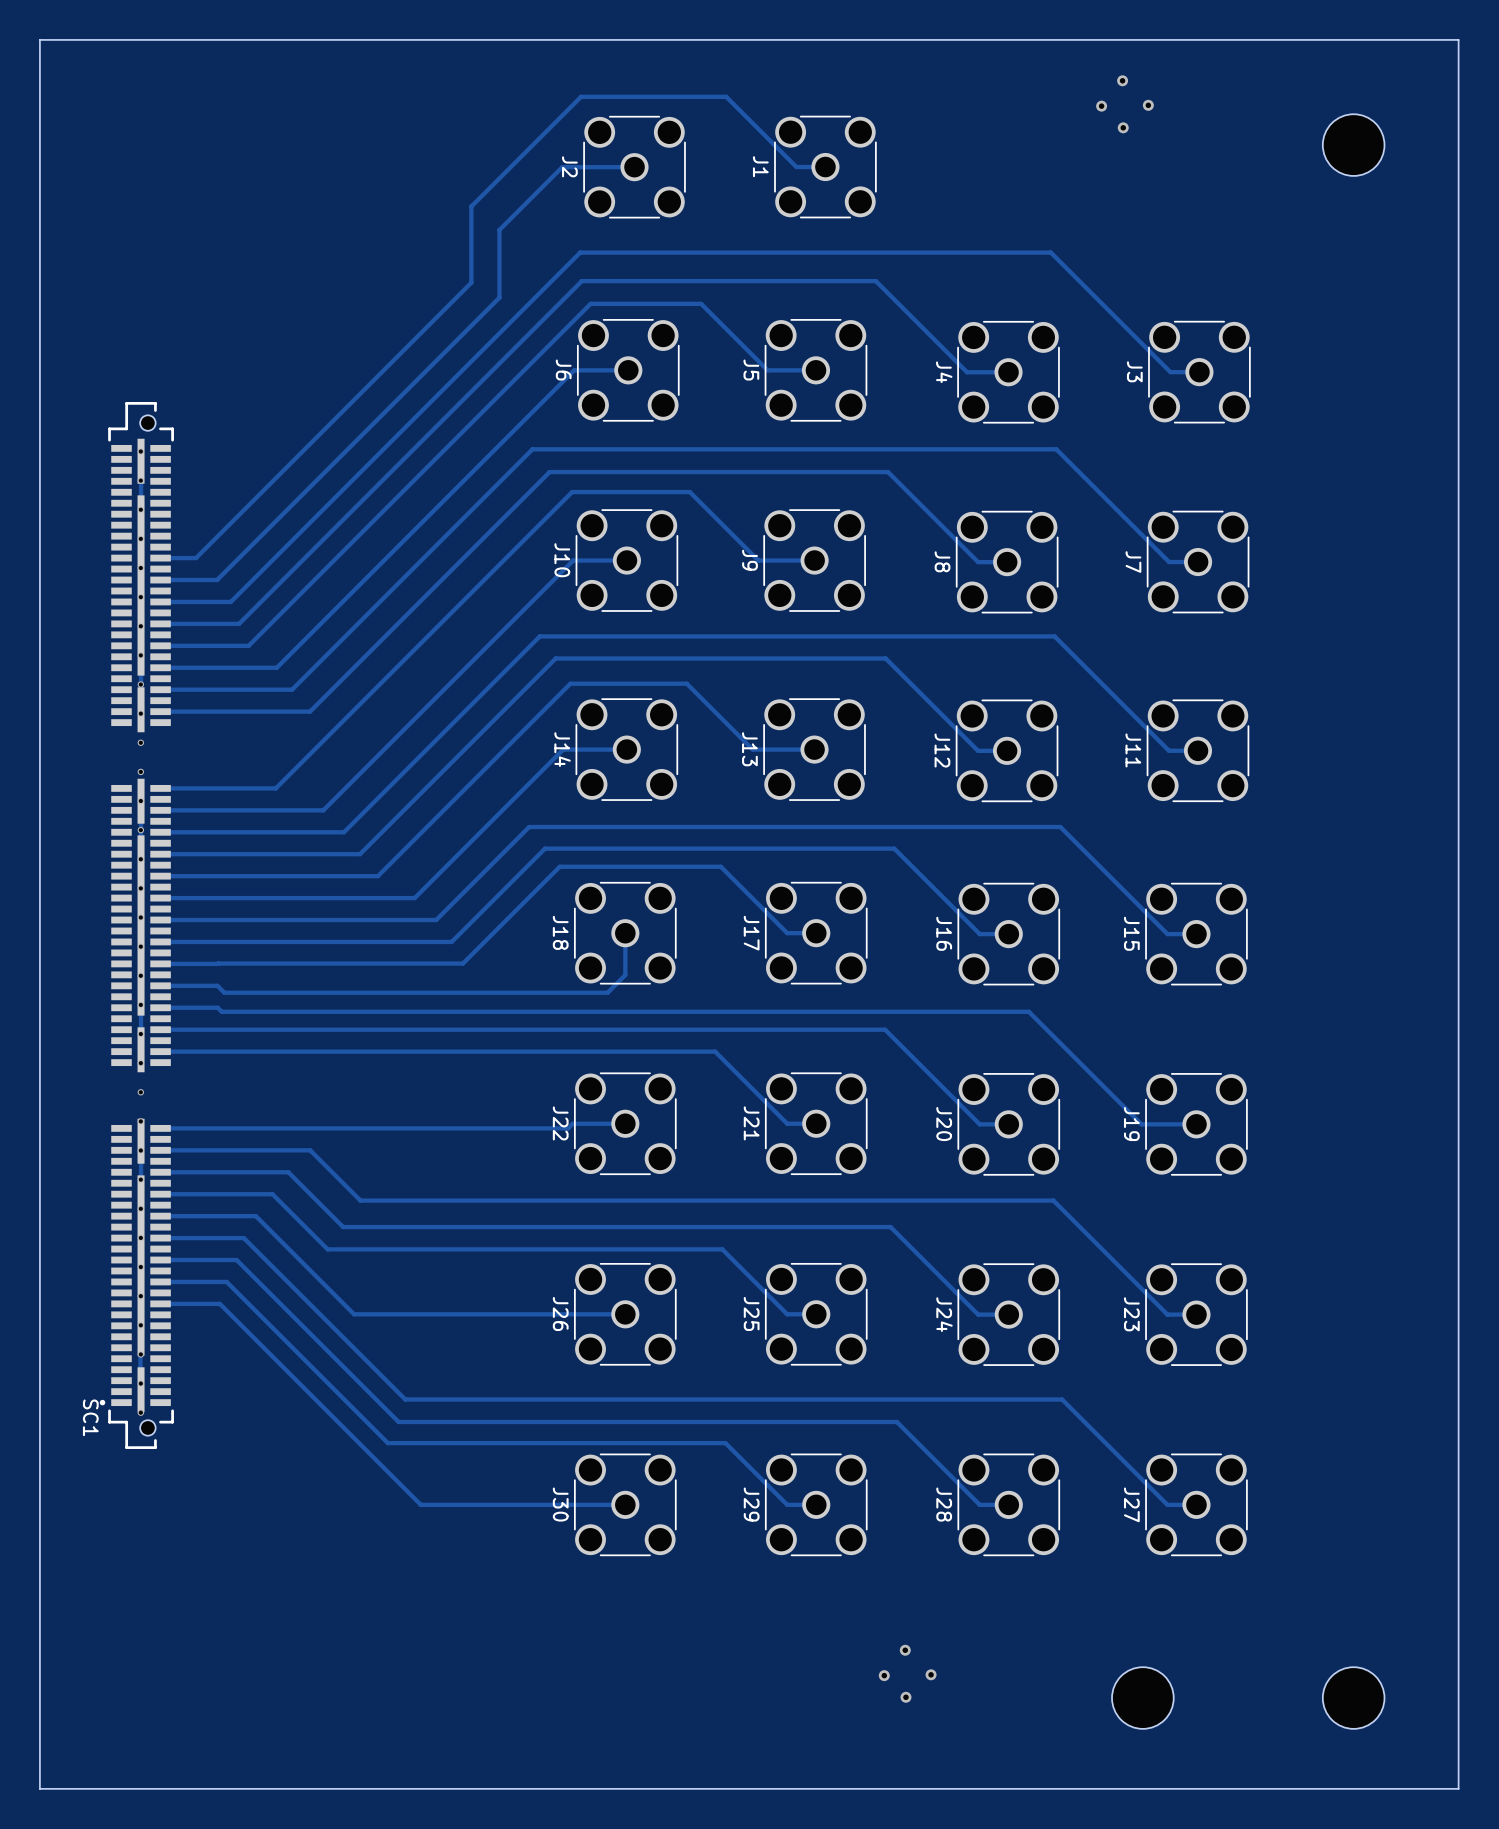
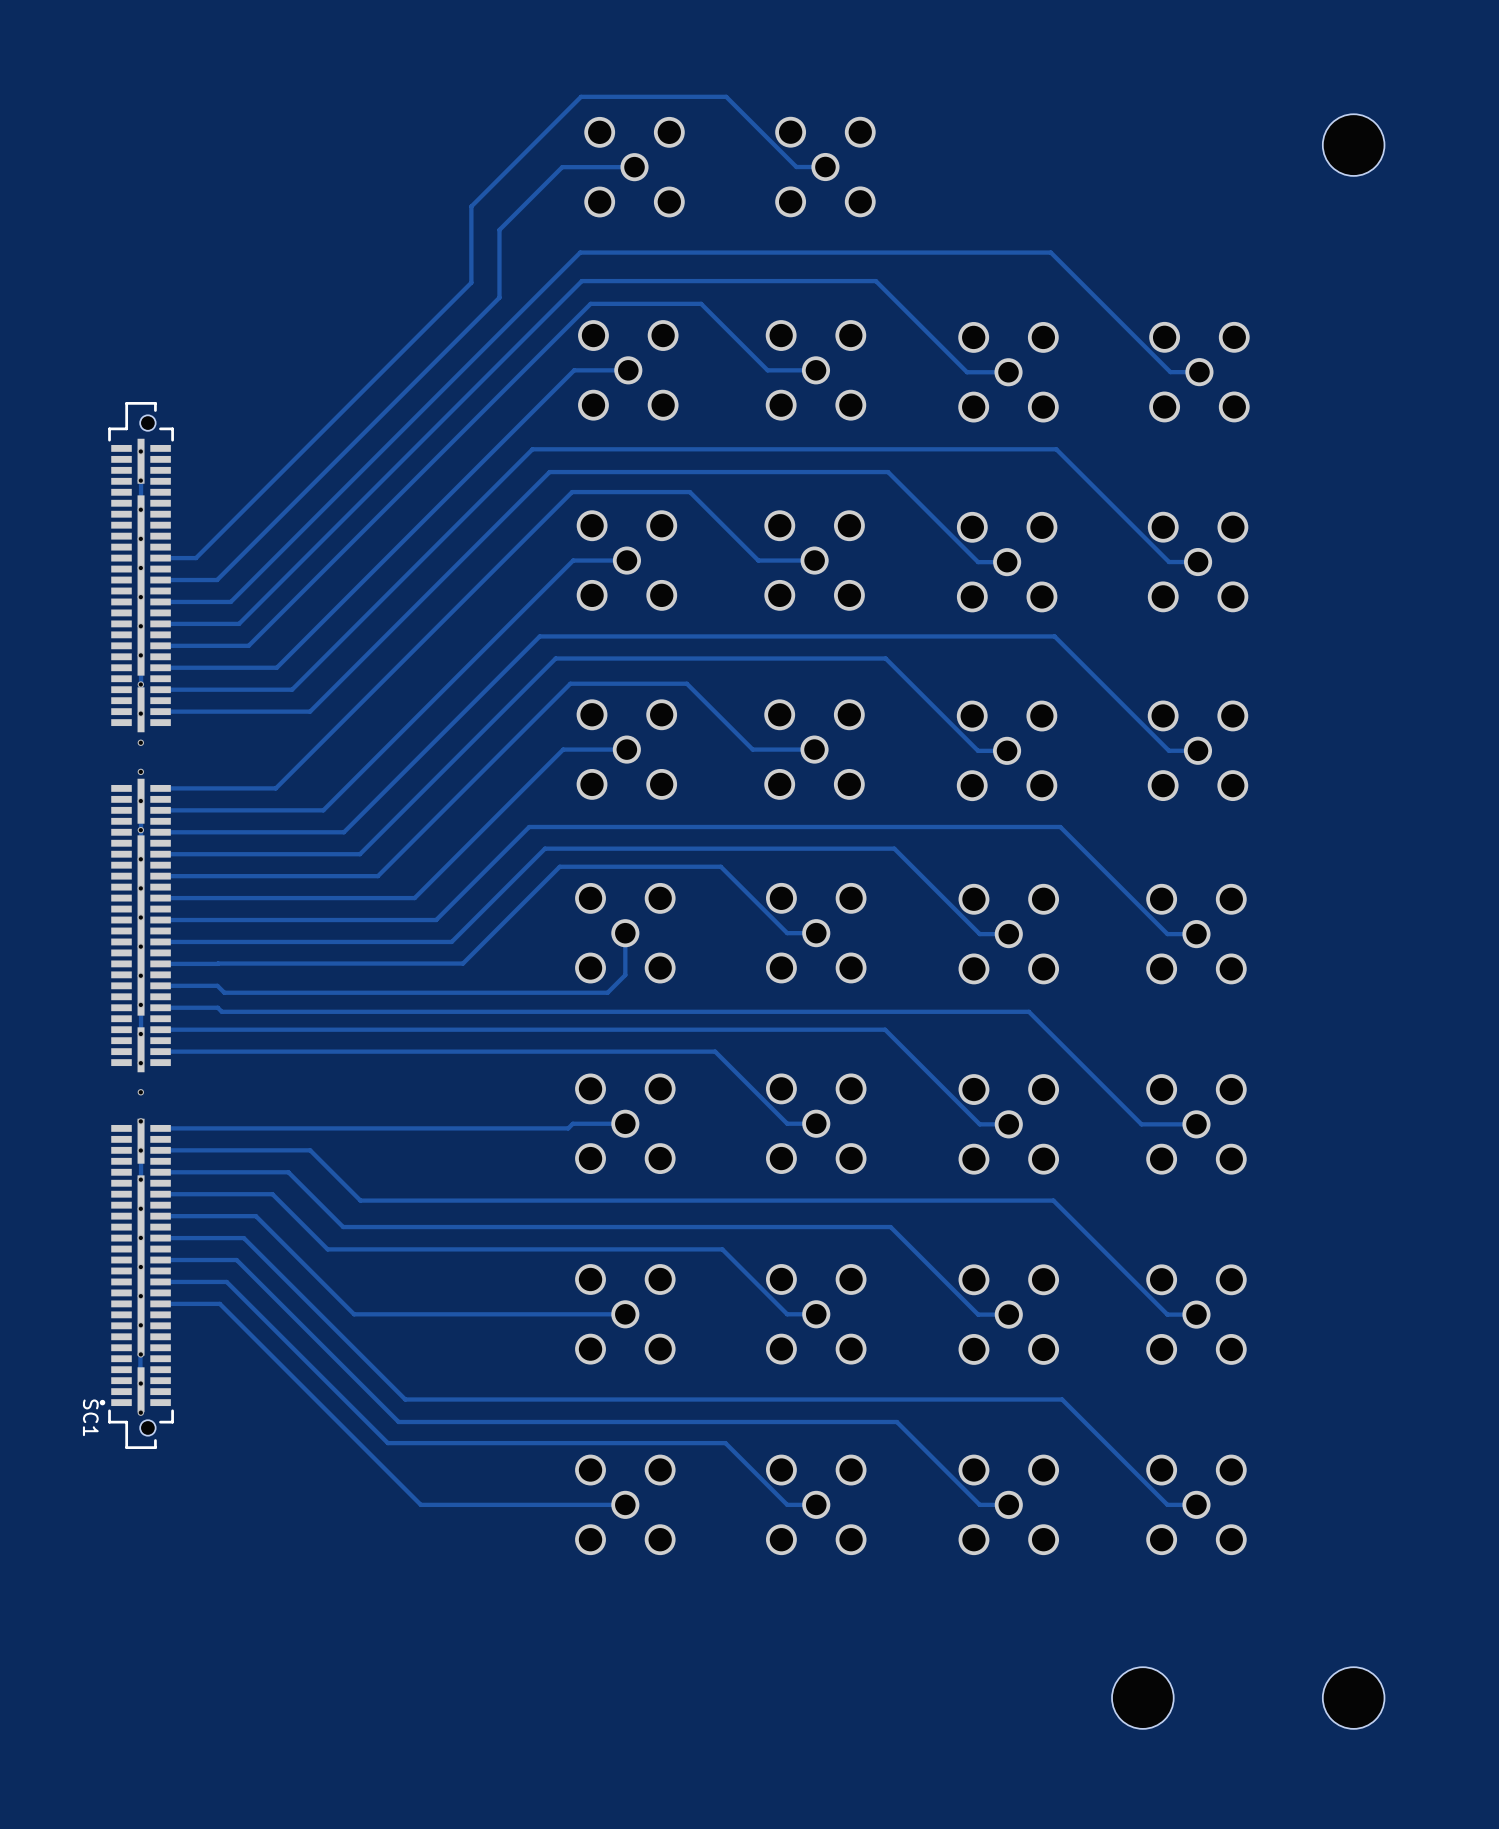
board edge: (1458, 39) (1458, 1788) (39, 1788) (39, 39) (1458, 39) -> none
via: (1122, 80) -> none
via: (1148, 105) -> none
via: (1101, 106) -> none
via: (1123, 127) -> none
J2 side: bottom (634, 167) -> top (634, 167)
J1 side: bottom (825, 167) -> top (825, 167)
J6 side: bottom (628, 370) -> top (628, 370)
J5 side: bottom (815, 370) -> top (815, 370)
J4 side: bottom (1008, 372) -> top (1008, 372)
J3 side: bottom (1199, 372) -> top (1199, 372)
J10 side: bottom (626, 560) -> top (626, 560)
J9 side: bottom (814, 560) -> top (814, 560)
J8 side: bottom (1007, 562) -> top (1007, 562)
J7 side: bottom (1198, 562) -> top (1198, 562)
J14 side: bottom (626, 749) -> top (626, 749)
J13 side: bottom (814, 749) -> top (814, 749)
J12 side: bottom (1007, 750) -> top (1007, 750)
J11 side: bottom (1197, 750) -> top (1197, 750)
J18 side: bottom (625, 933) -> top (625, 933)
J17 side: bottom (816, 933) -> top (816, 933)
J16 side: bottom (1008, 934) -> top (1008, 934)
J15 side: bottom (1196, 934) -> top (1196, 934)
J22 side: bottom (625, 1123) -> top (625, 1123)
J21 side: bottom (816, 1123) -> top (816, 1123)
J20 side: bottom (1008, 1124) -> top (1008, 1124)
J19 side: bottom (1196, 1124) -> top (1196, 1124)
J26 side: bottom (625, 1314) -> top (625, 1314)
J25 side: bottom (816, 1314) -> top (816, 1314)
J24 side: bottom (1008, 1314) -> top (1008, 1314)
J23 side: bottom (1196, 1314) -> top (1196, 1314)
J30 side: bottom (625, 1504) -> top (625, 1504)
J29 side: bottom (816, 1504) -> top (816, 1504)
J28 side: bottom (1008, 1504) -> top (1008, 1504)
J27 side: bottom (1196, 1504) -> top (1196, 1504)
via: (905, 1650) -> none
via: (931, 1674) -> none
via: (884, 1675) -> none
via: (905, 1697) -> none

